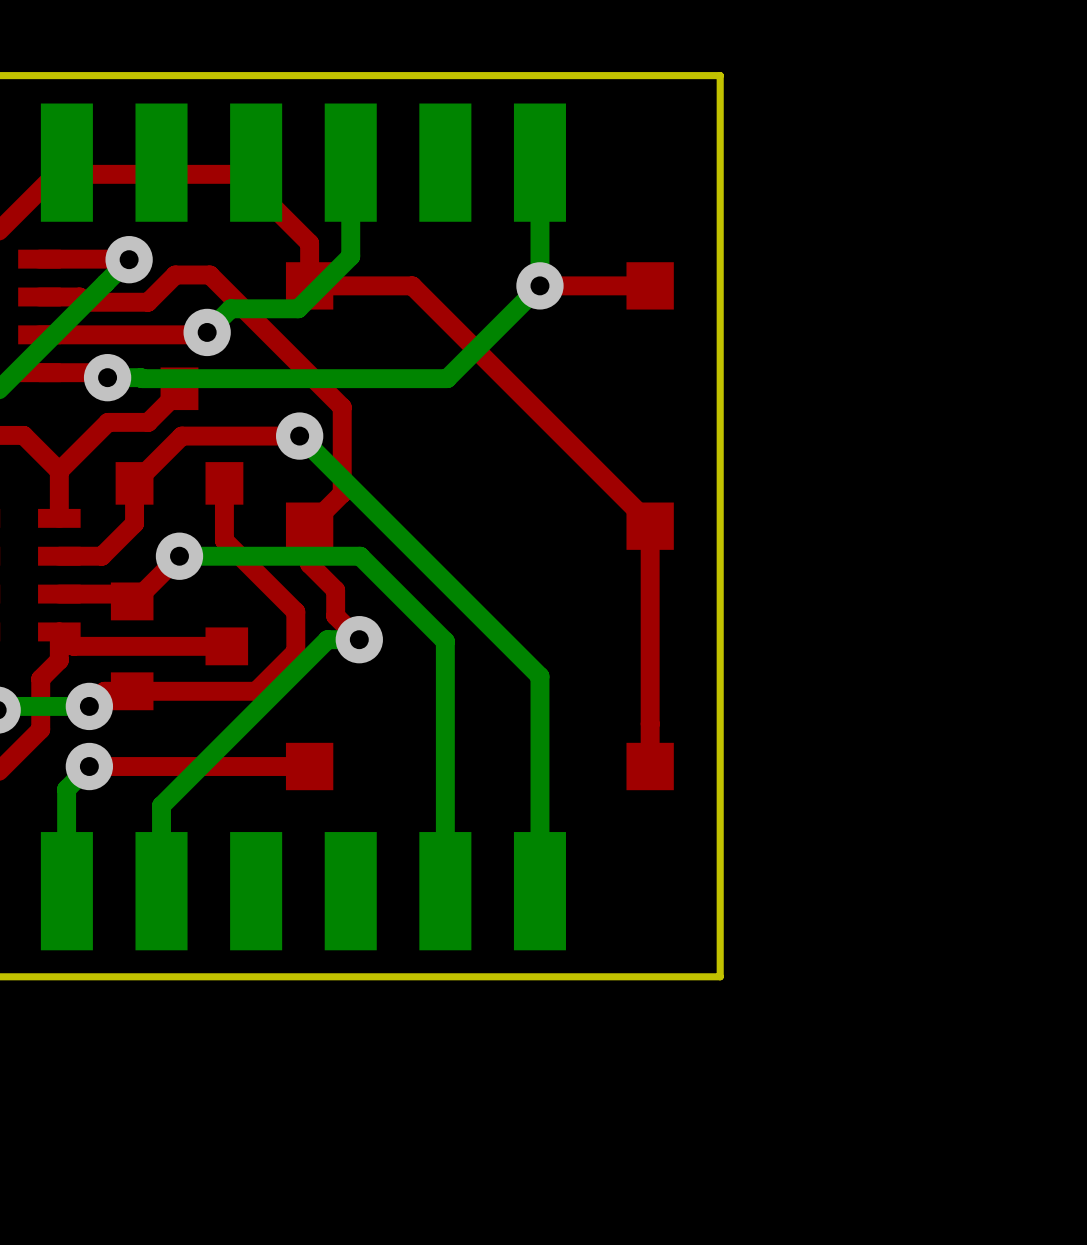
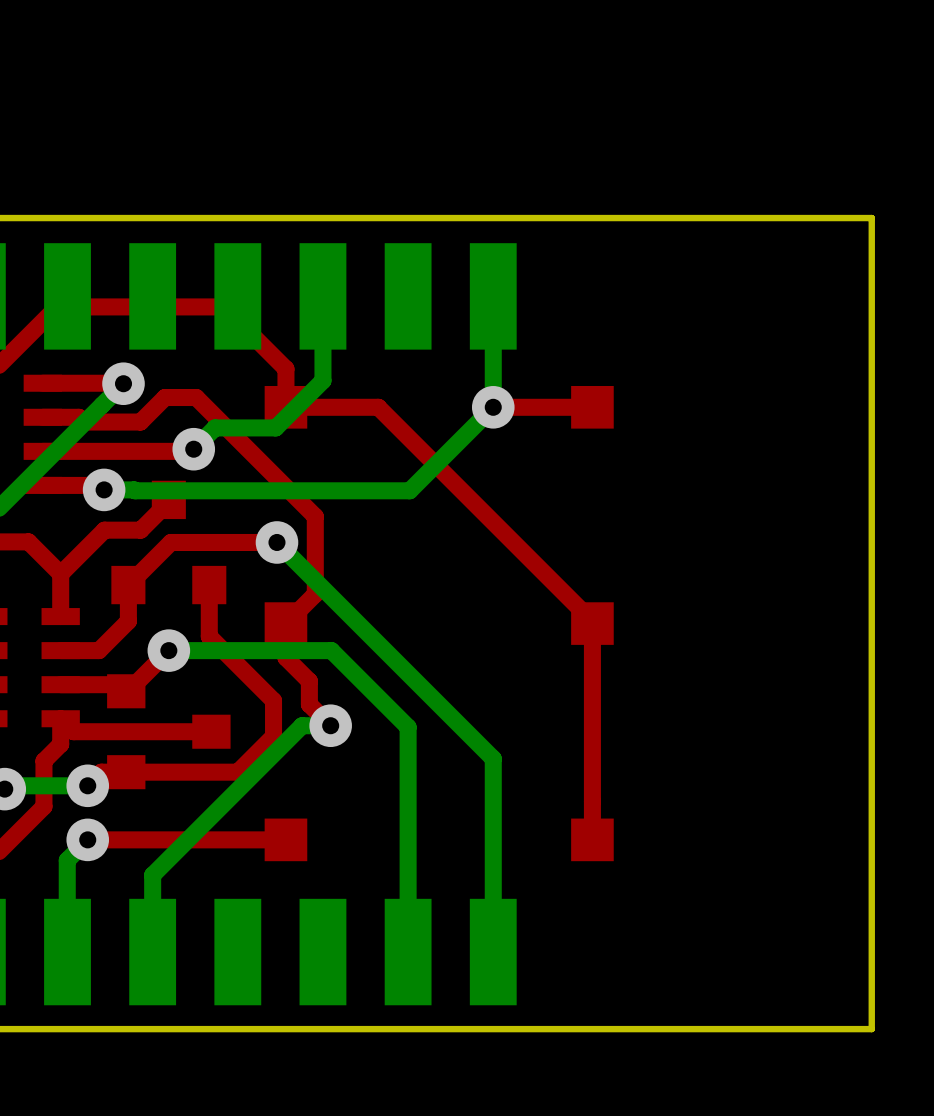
board edge: (720, 75) (720, 976) -> (655, 218) (871, 218) (871, 1029) (655, 1029)

